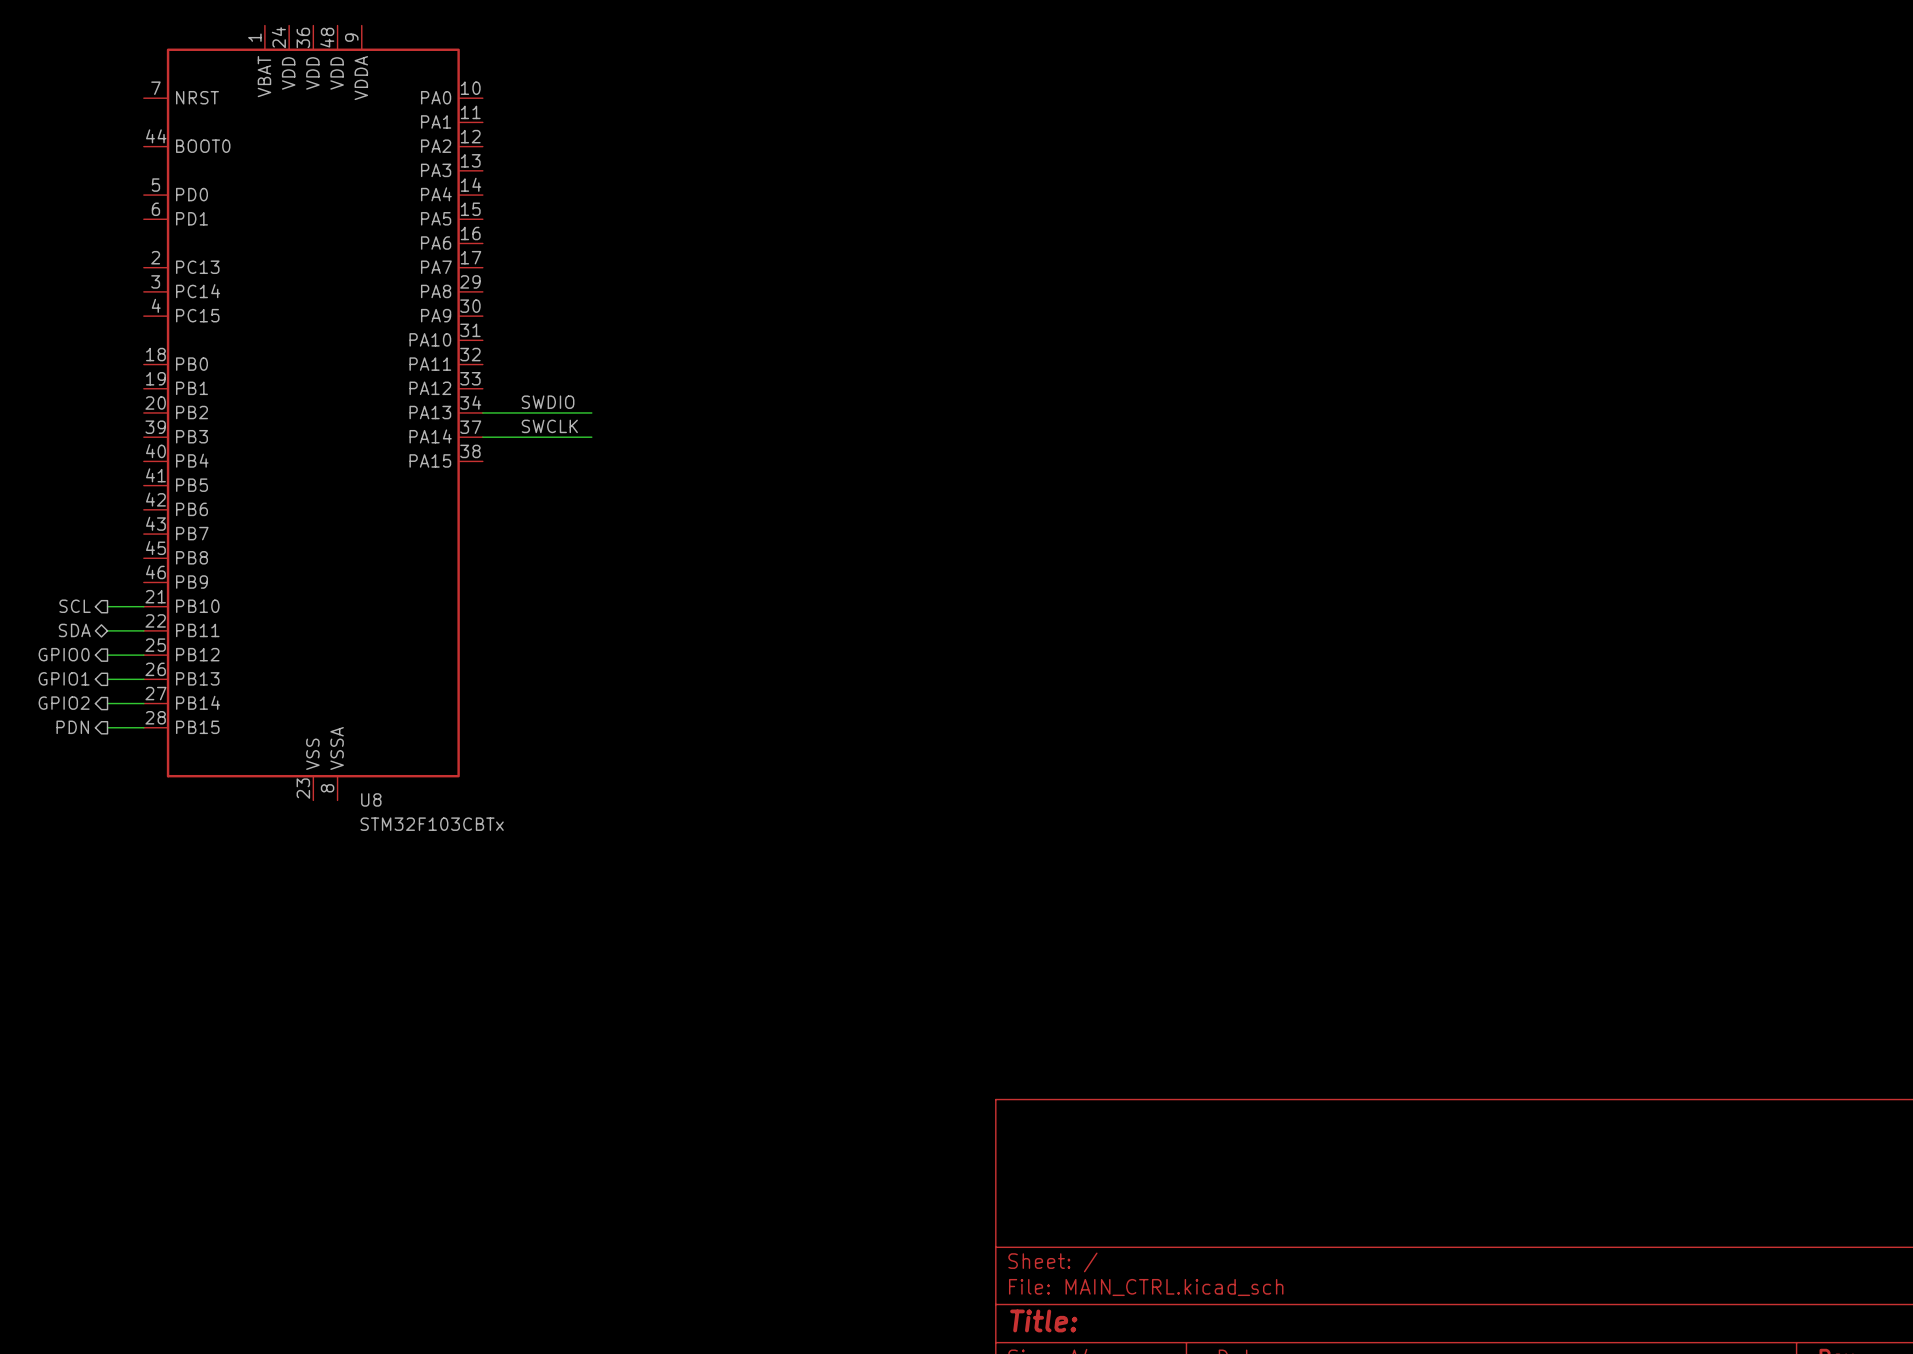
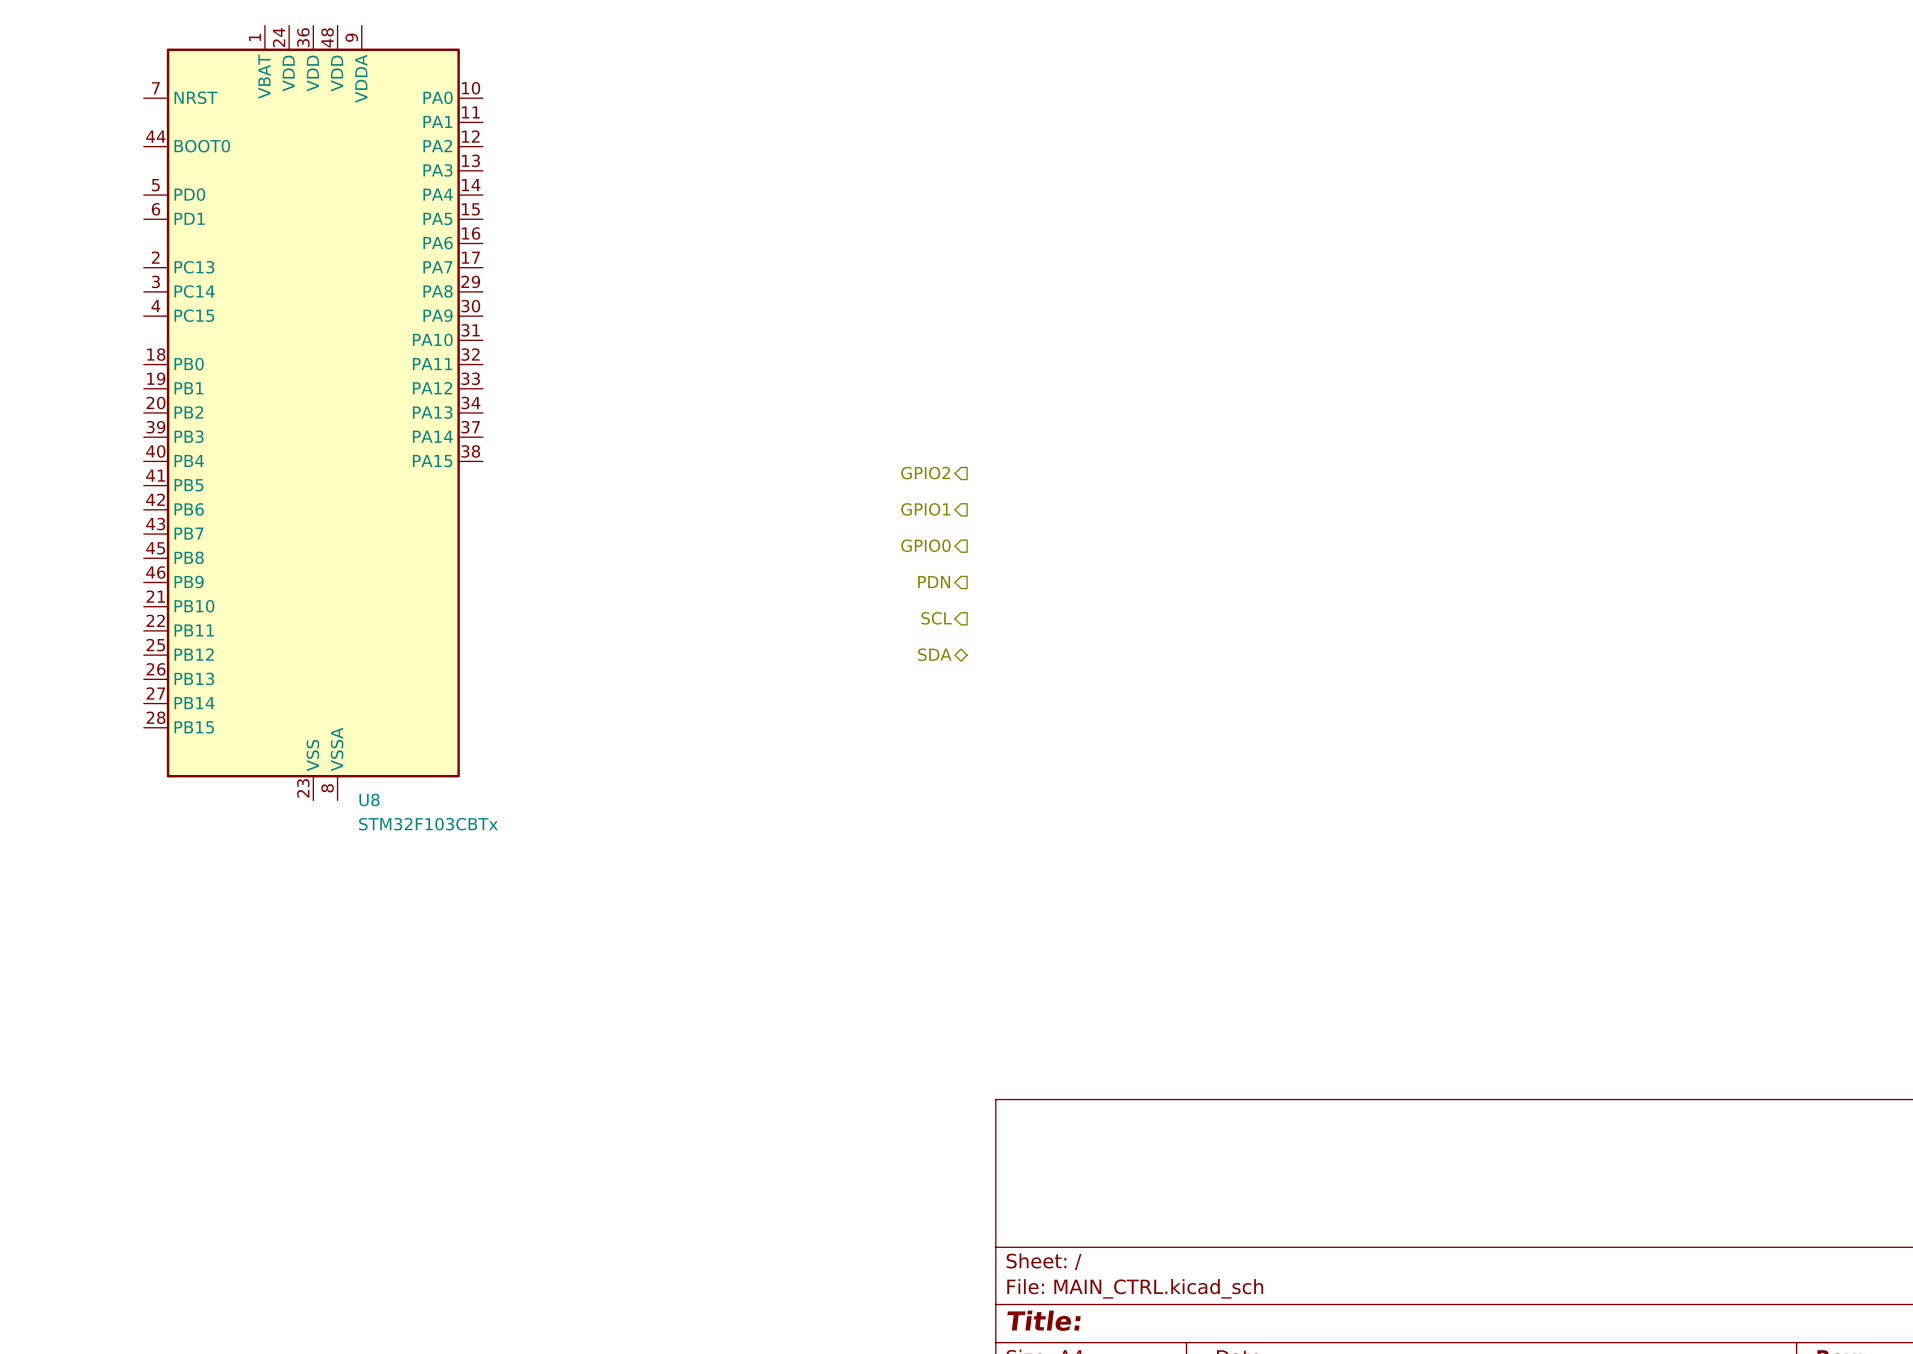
label: SWDIO (548, 402) -> none
wire: (482, 412) (591, 412) -> none
label: SWCLK (549, 426) -> none
wire: (482, 437) (591, 437) -> none
hierarchical label: none -> GPIO2 (925, 473)
hierarchical label: none -> GPIO1 (925, 509)
hierarchical label: none -> GPIO0 (925, 545)
hierarchical label: none -> PDN (934, 582)
hierarchical label: SCL (75, 606) -> none
wire: (107, 606) (143, 606) -> none
hierarchical label: none -> SCL (936, 618)
hierarchical label: SDA (74, 630) -> none
wire: (107, 630) (143, 630) -> none
hierarchical label: GPIO0 (64, 654) -> none
hierarchical label: none -> SDA (934, 654)
wire: (107, 655) (143, 655) -> none
hierarchical label: GPIO1 (64, 678) -> none
wire: (107, 679) (143, 679) -> none
hierarchical label: GPIO2 (64, 703) -> none
wire: (107, 703) (143, 703) -> none
hierarchical label: PDN (72, 727) -> none
wire: (107, 727) (143, 727) -> none

